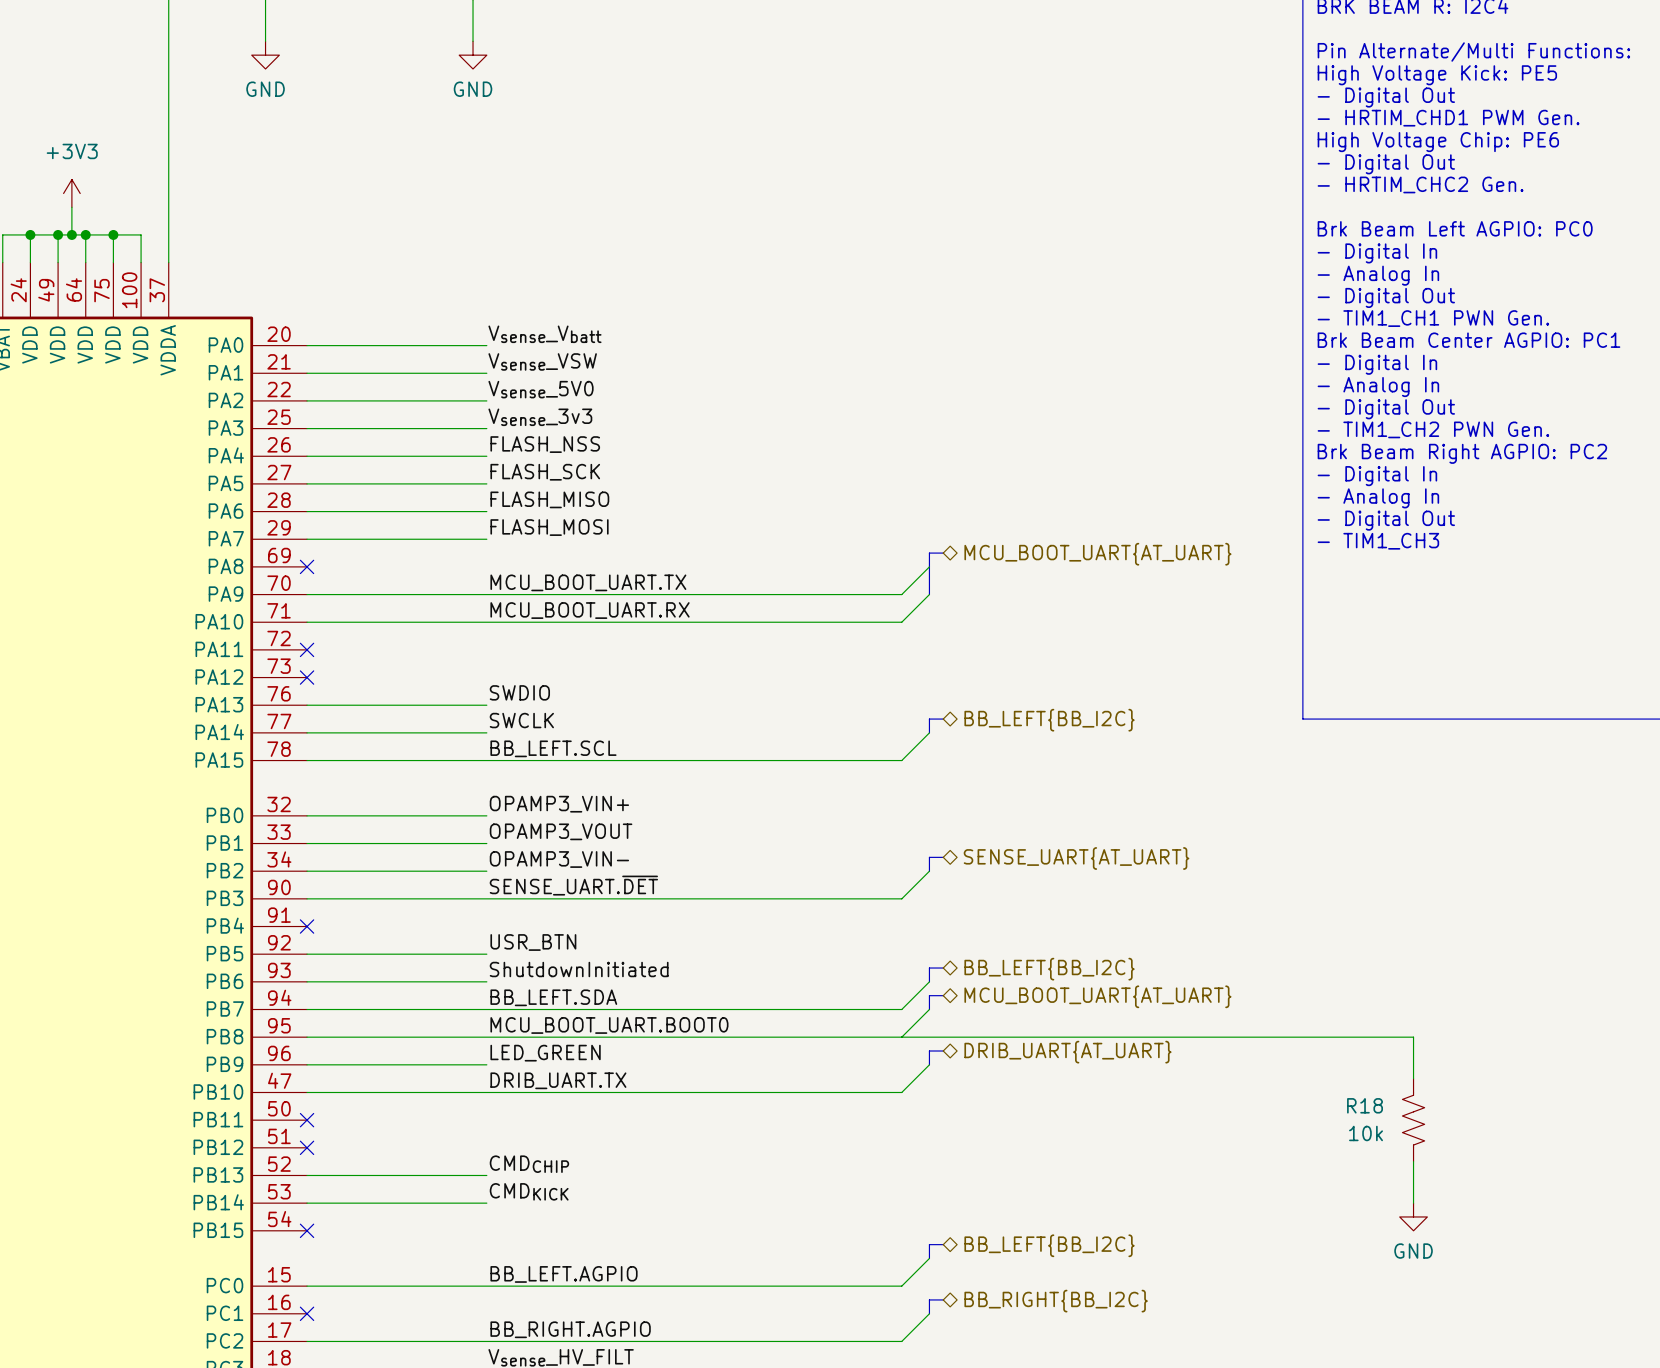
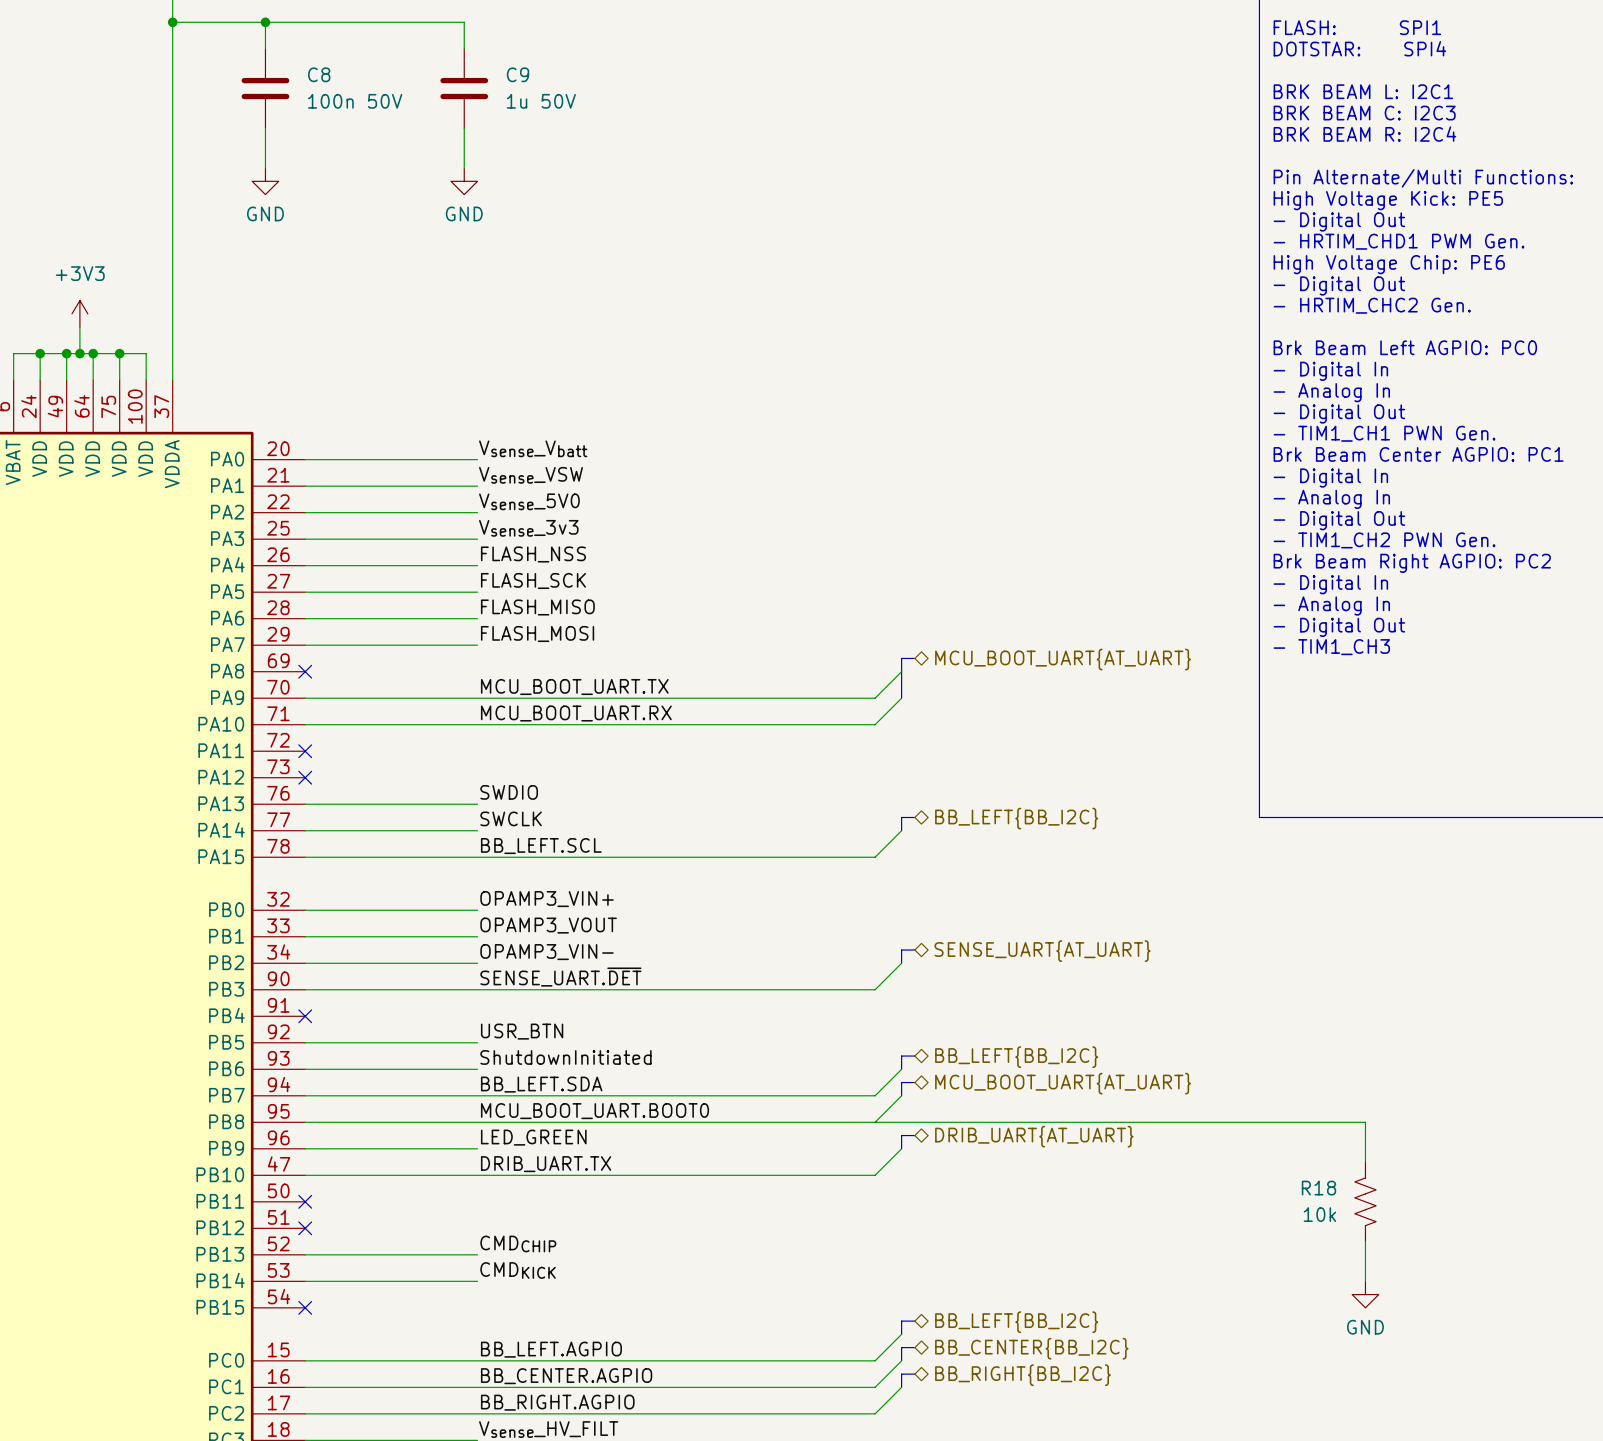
bus: none -> (914, 1347) (901, 1347) (901, 1360)
hierarchical label: none -> BB_CENTER{BB_I2C} (1031, 1348)
wire: none -> (901, 1360) (875, 1387) (305, 1387)
label: none -> BB_CENTER.AGPIO (566, 1376)
no-connect mark: (307, 1313) -> none

